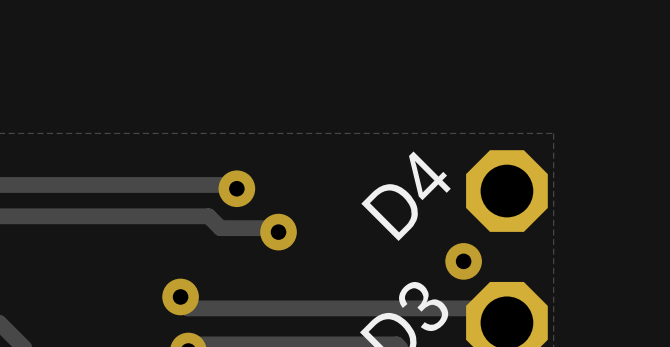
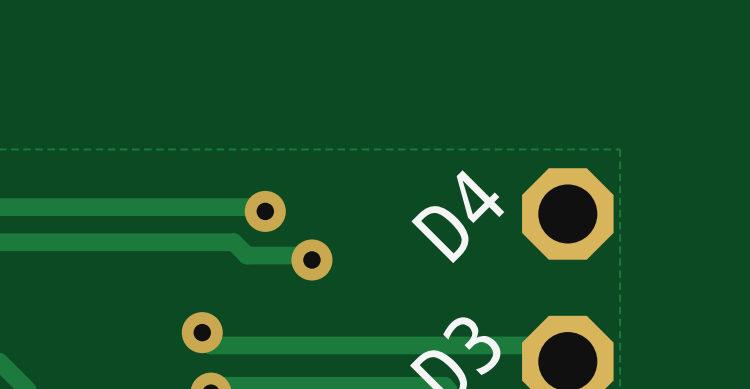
via: (463, 261) -> none

